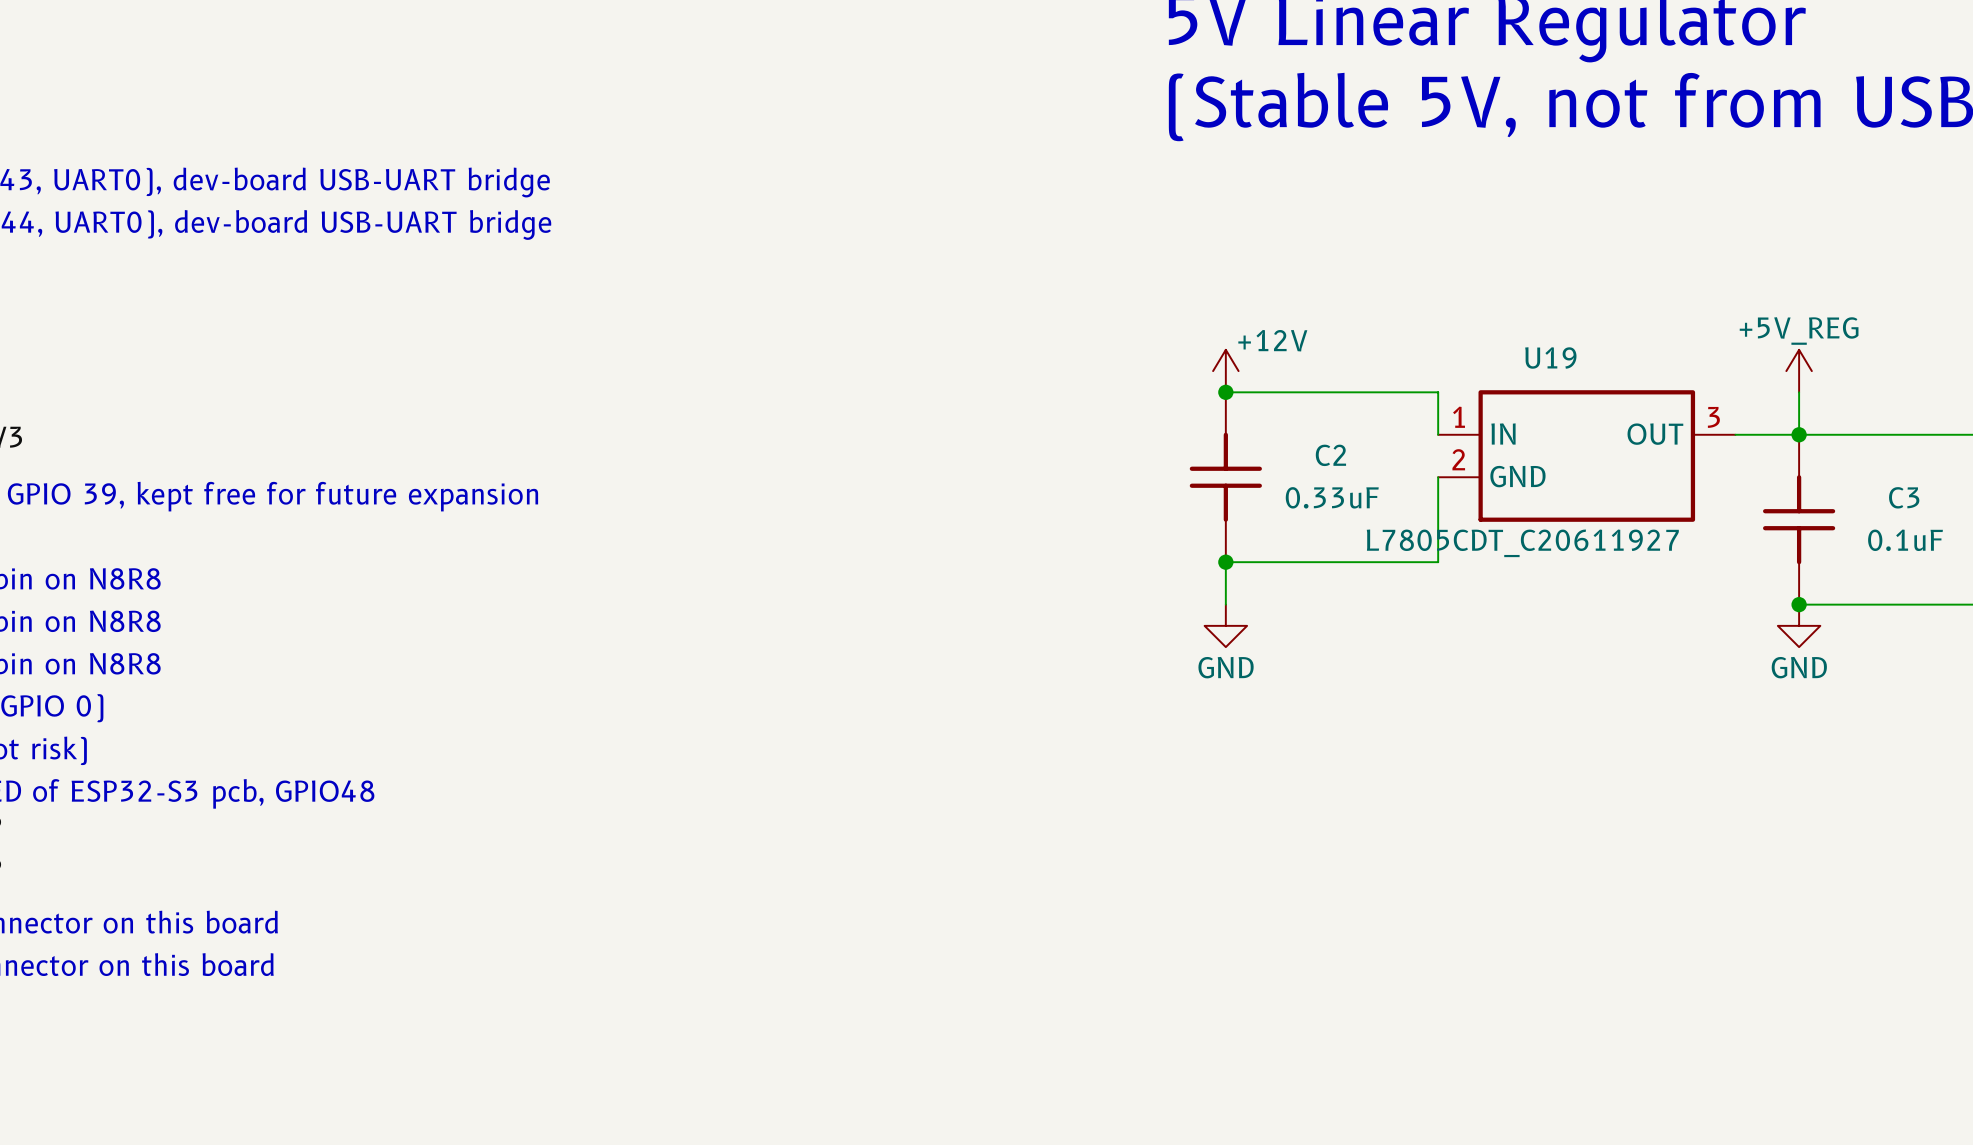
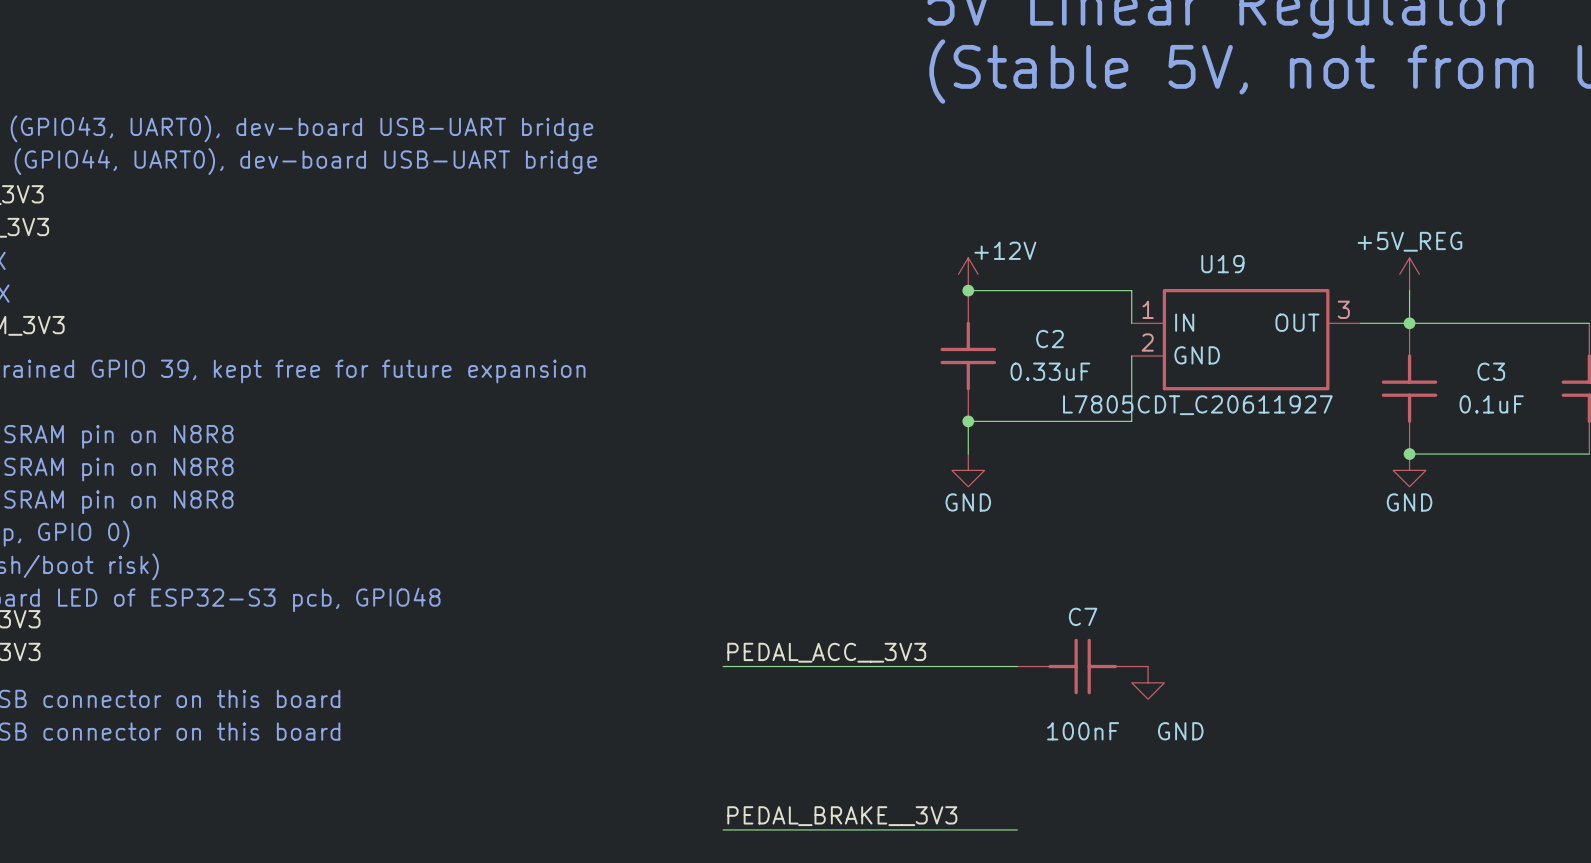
label: none -> PEDAL_ACC__3V3 (826, 652)
wire: none -> (723, 666) (1017, 666)
C7: none -> 100nF (1082, 666)
power symbol: none -> GND (1148, 682)
label: none -> PEDAL_BRAKE__3V3 (842, 816)
wire: none -> (723, 829) (1017, 829)

